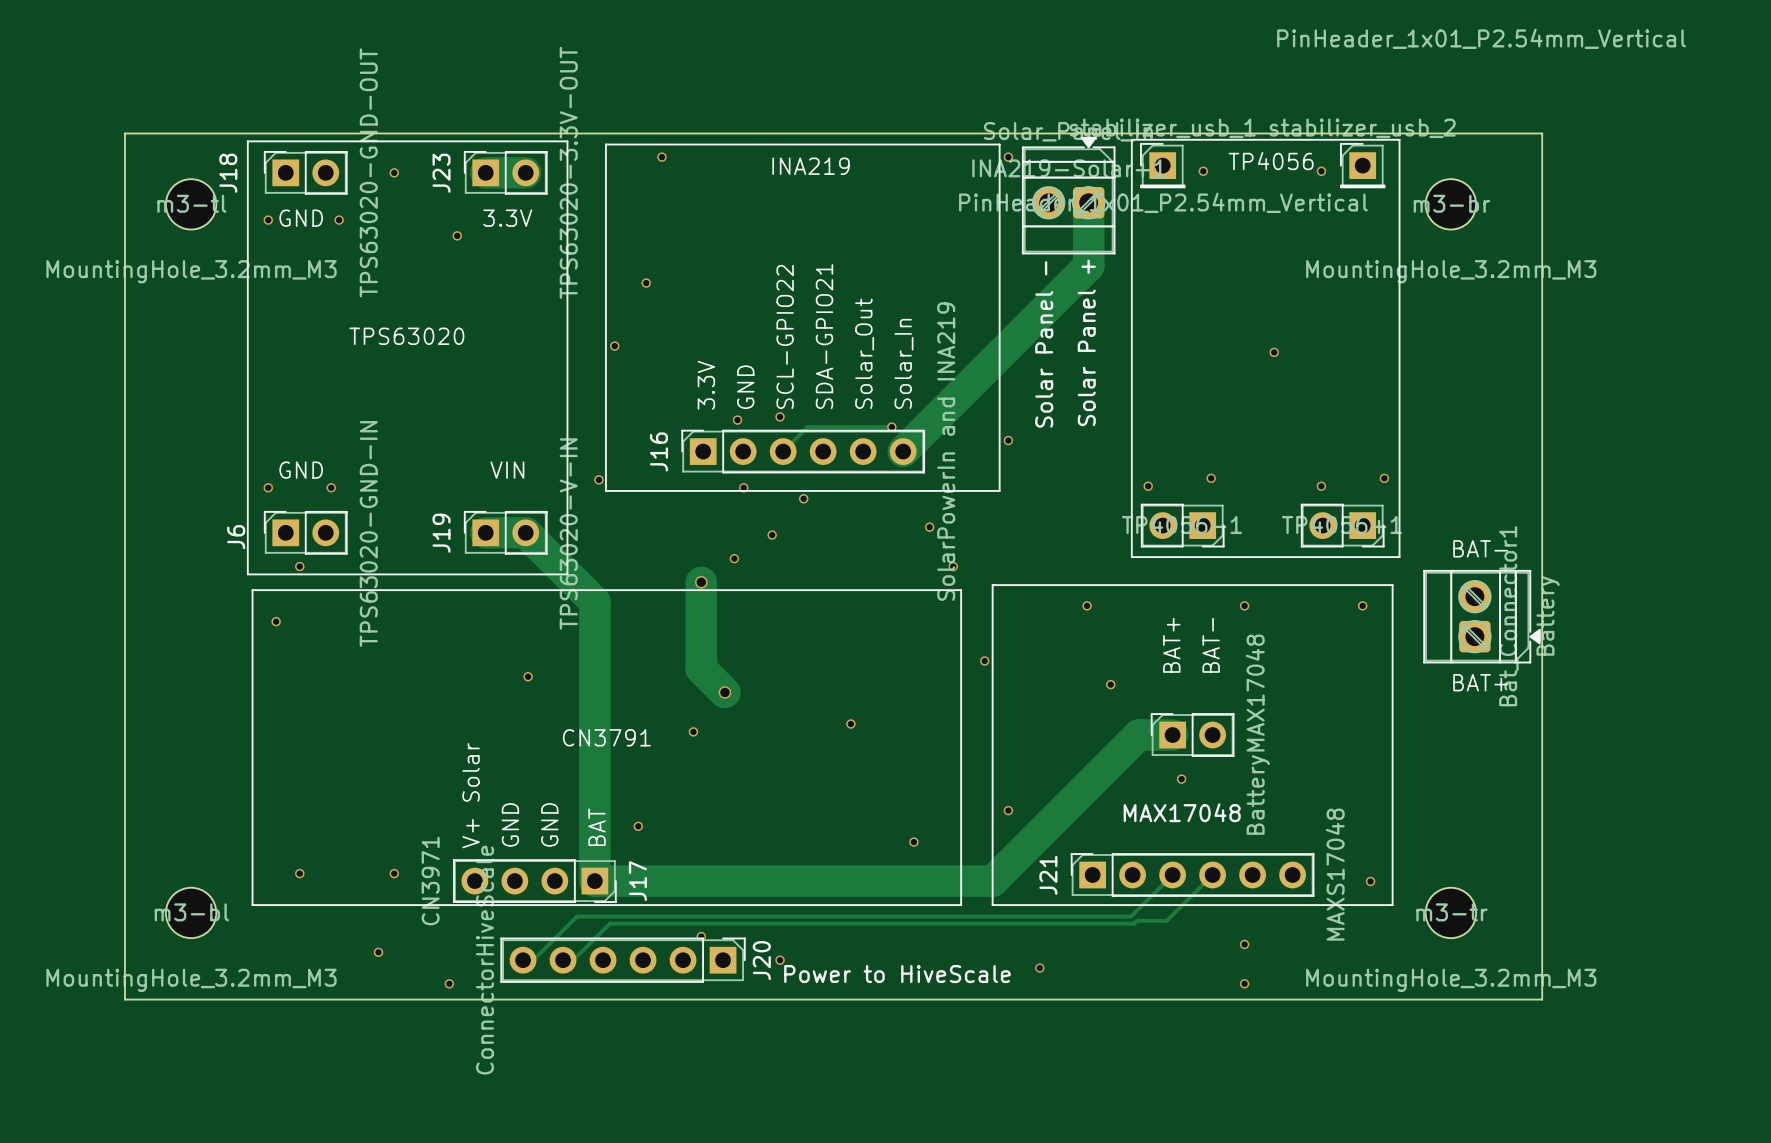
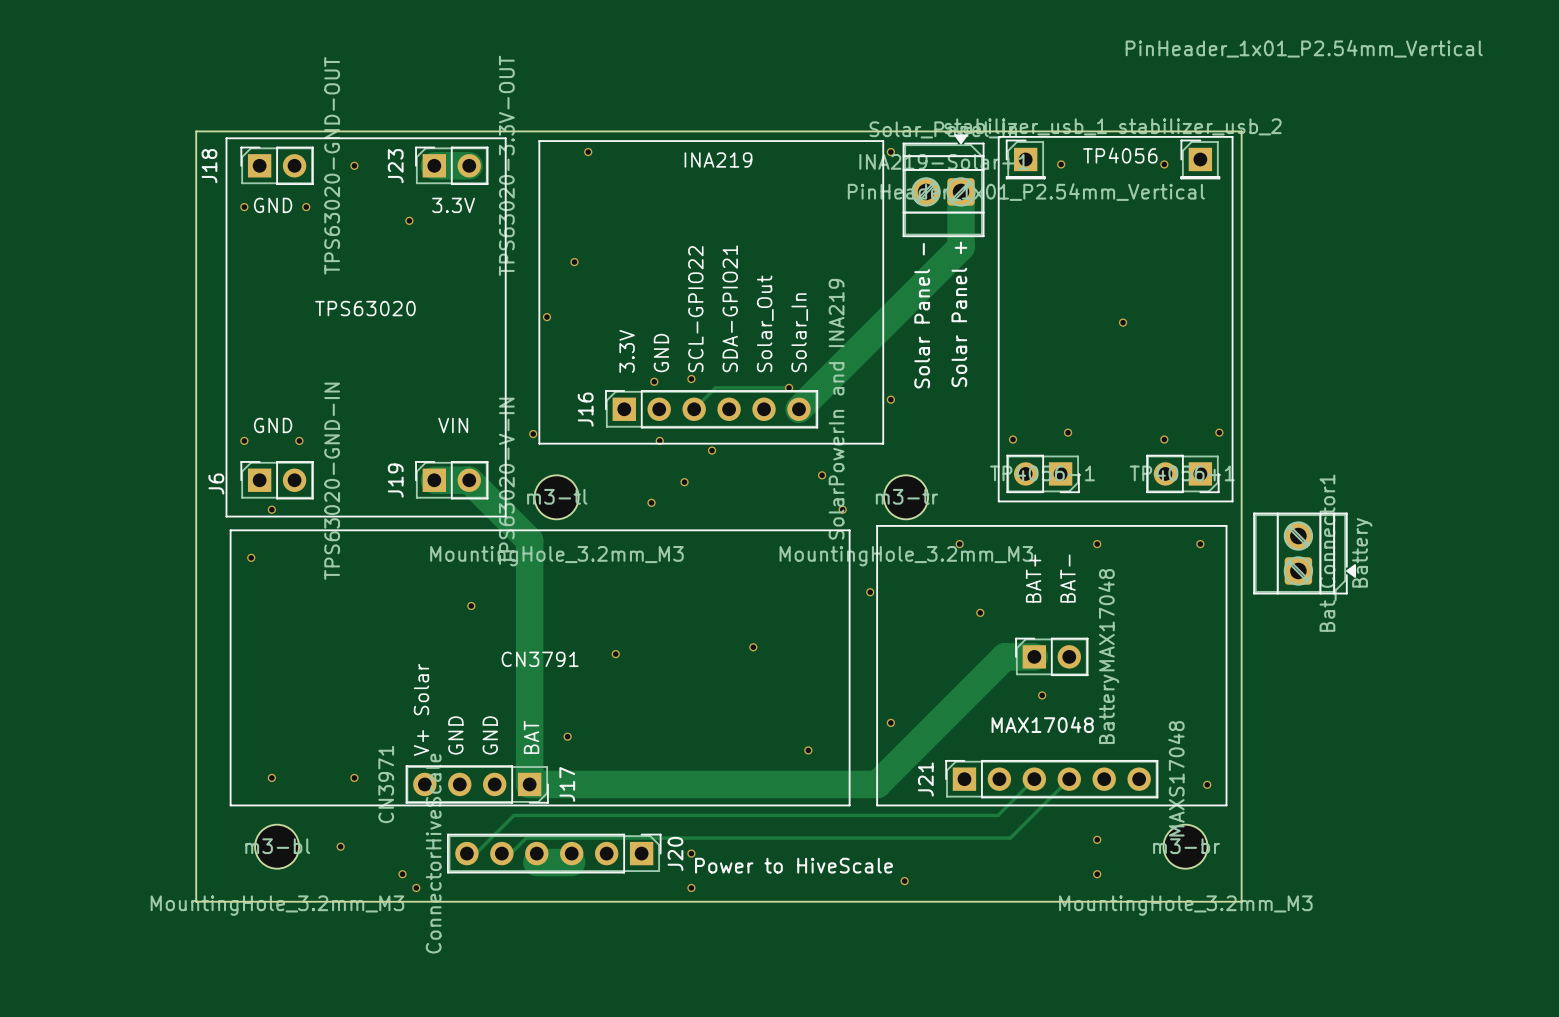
board edge: (213, 133) (124, 133) (124, 999) (1542, 999) (1542, 133) (1409, 133) -> (196, 131) (196, 901) (1241, 901) (1241, 131)
m3-tl position: (191, 204) -> (556, 497)
m3-br position: (1450, 204) -> (1185, 846)
text: BAT- (1480, 548) -> none
track: (701, 582) (701, 668) (724, 692) -> none
via: (701, 582) -> none
text: BAT+ (1480, 682) -> none
via: (724, 692) -> none
m3-bl position: (191, 912) -> (277, 846)
m3-tr position: (1450, 912) -> (906, 497)
track: (1166, 920) (1136, 920) (1133, 923) (609, 923) (591, 942) -> (1029, 819) (1010, 838) (526, 838)
via: (701, 936) -> none
via position: (1039, 968) -> (904, 881)
track: none -> (536, 862) (571, 862)
via: none -> (416, 887)
via: none -> (691, 887)

